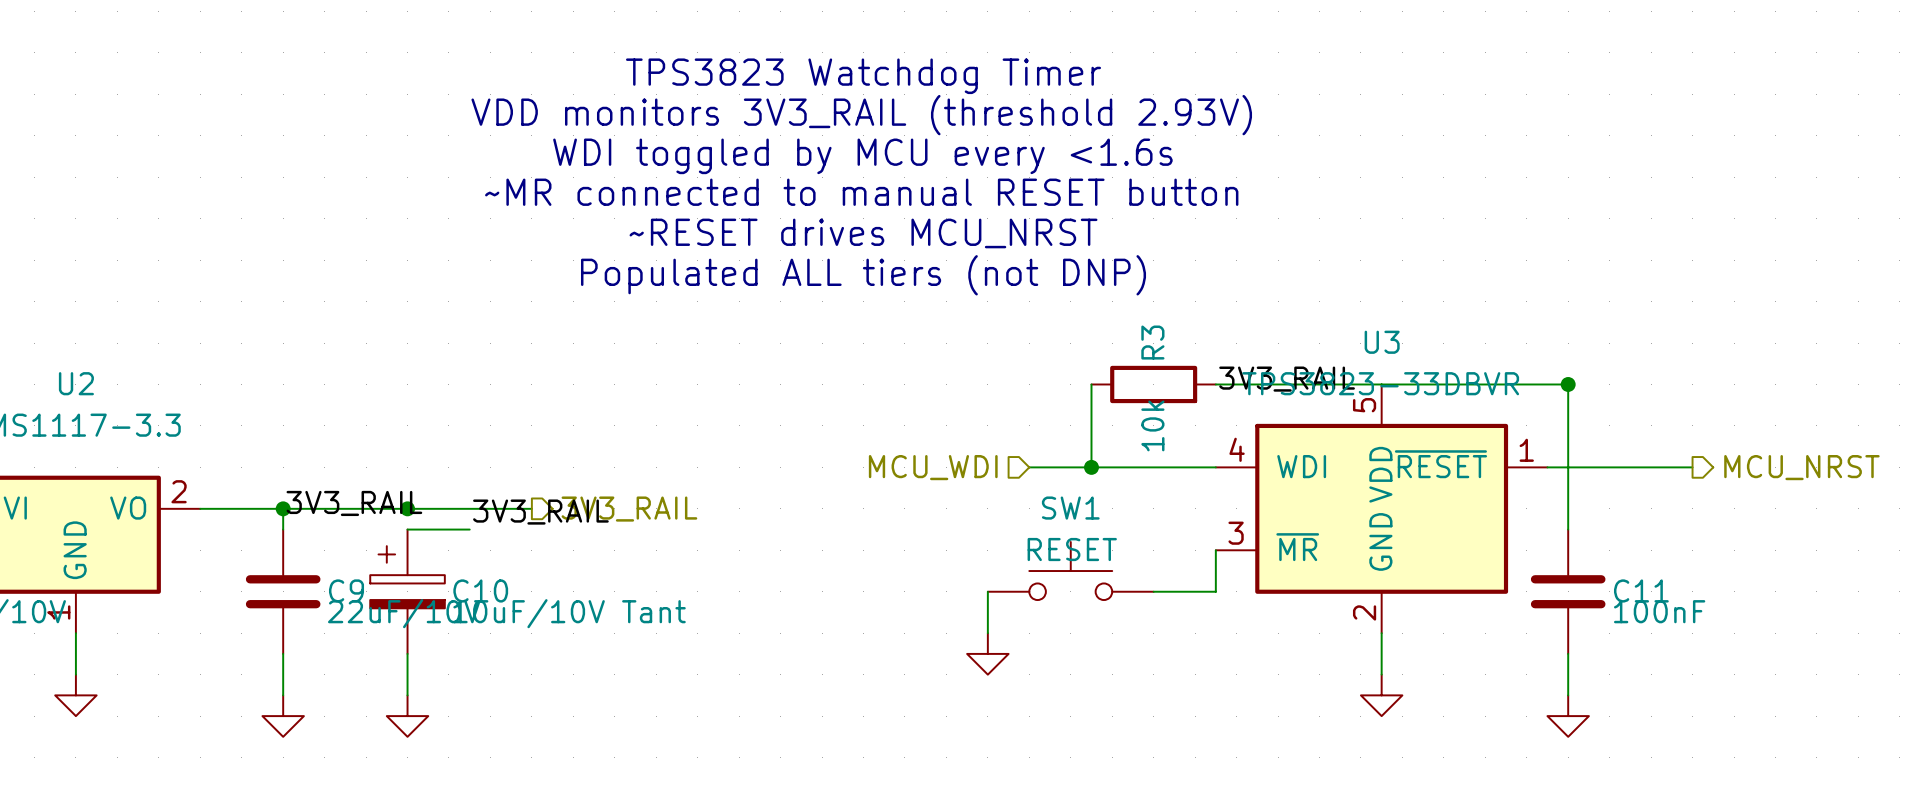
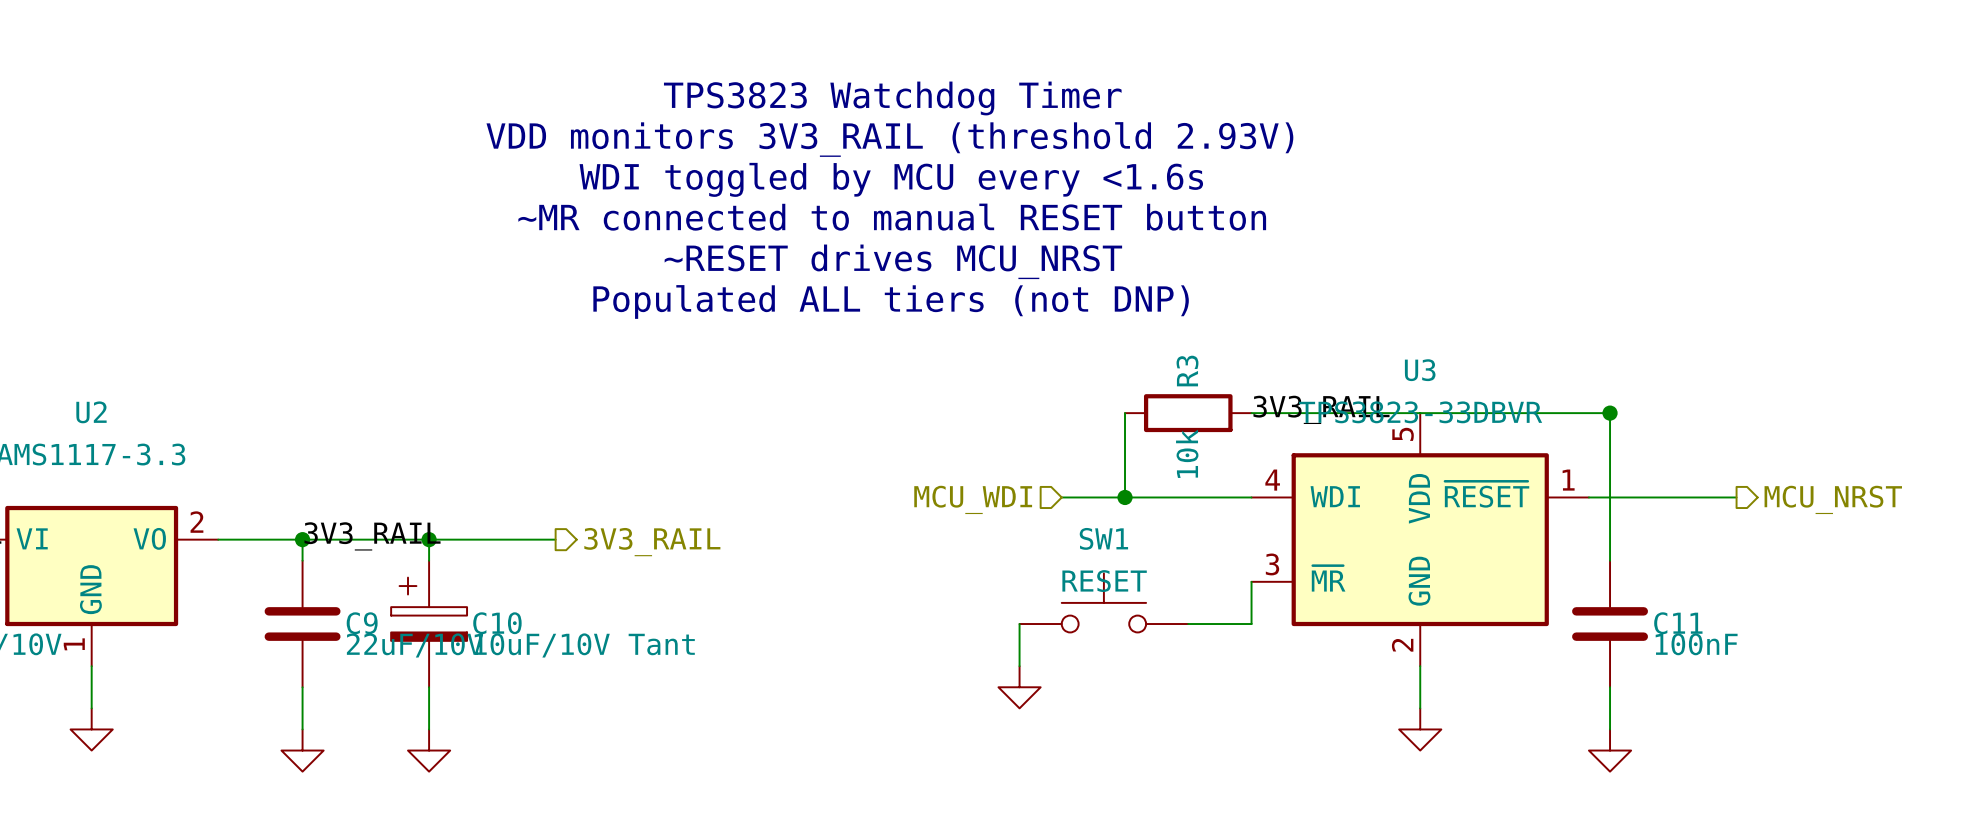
label: 3V3_RAIL (540, 512) -> none
wire: (407, 529) (469, 529) -> (429, 560) (429, 539)

